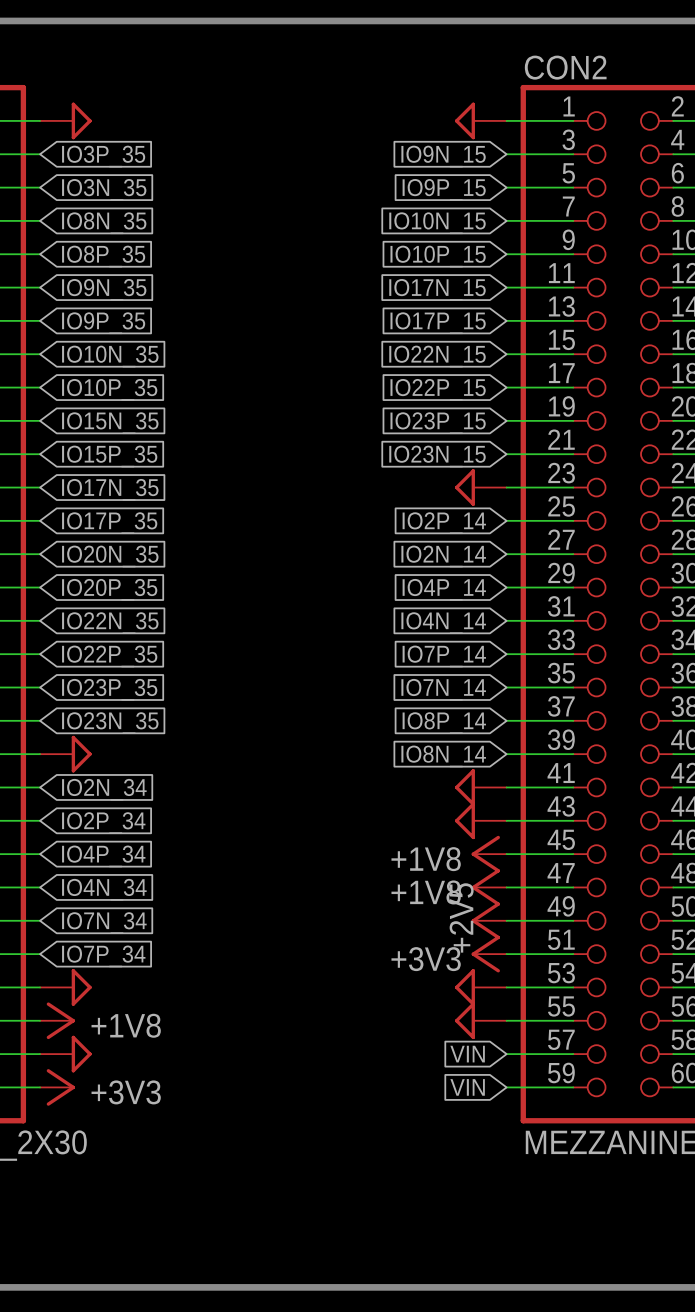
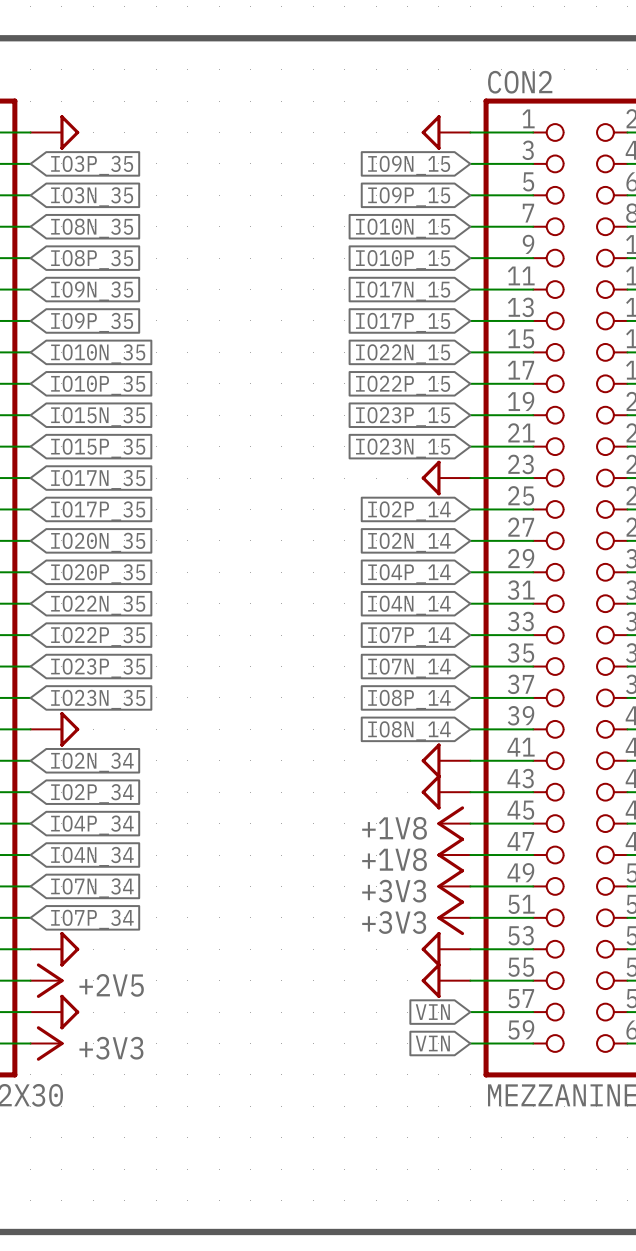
power symbol: +2V5 (489, 920) -> +3V3 (453, 886)
power symbol: +1V8 (57, 1020) -> +2V5 (47, 980)

